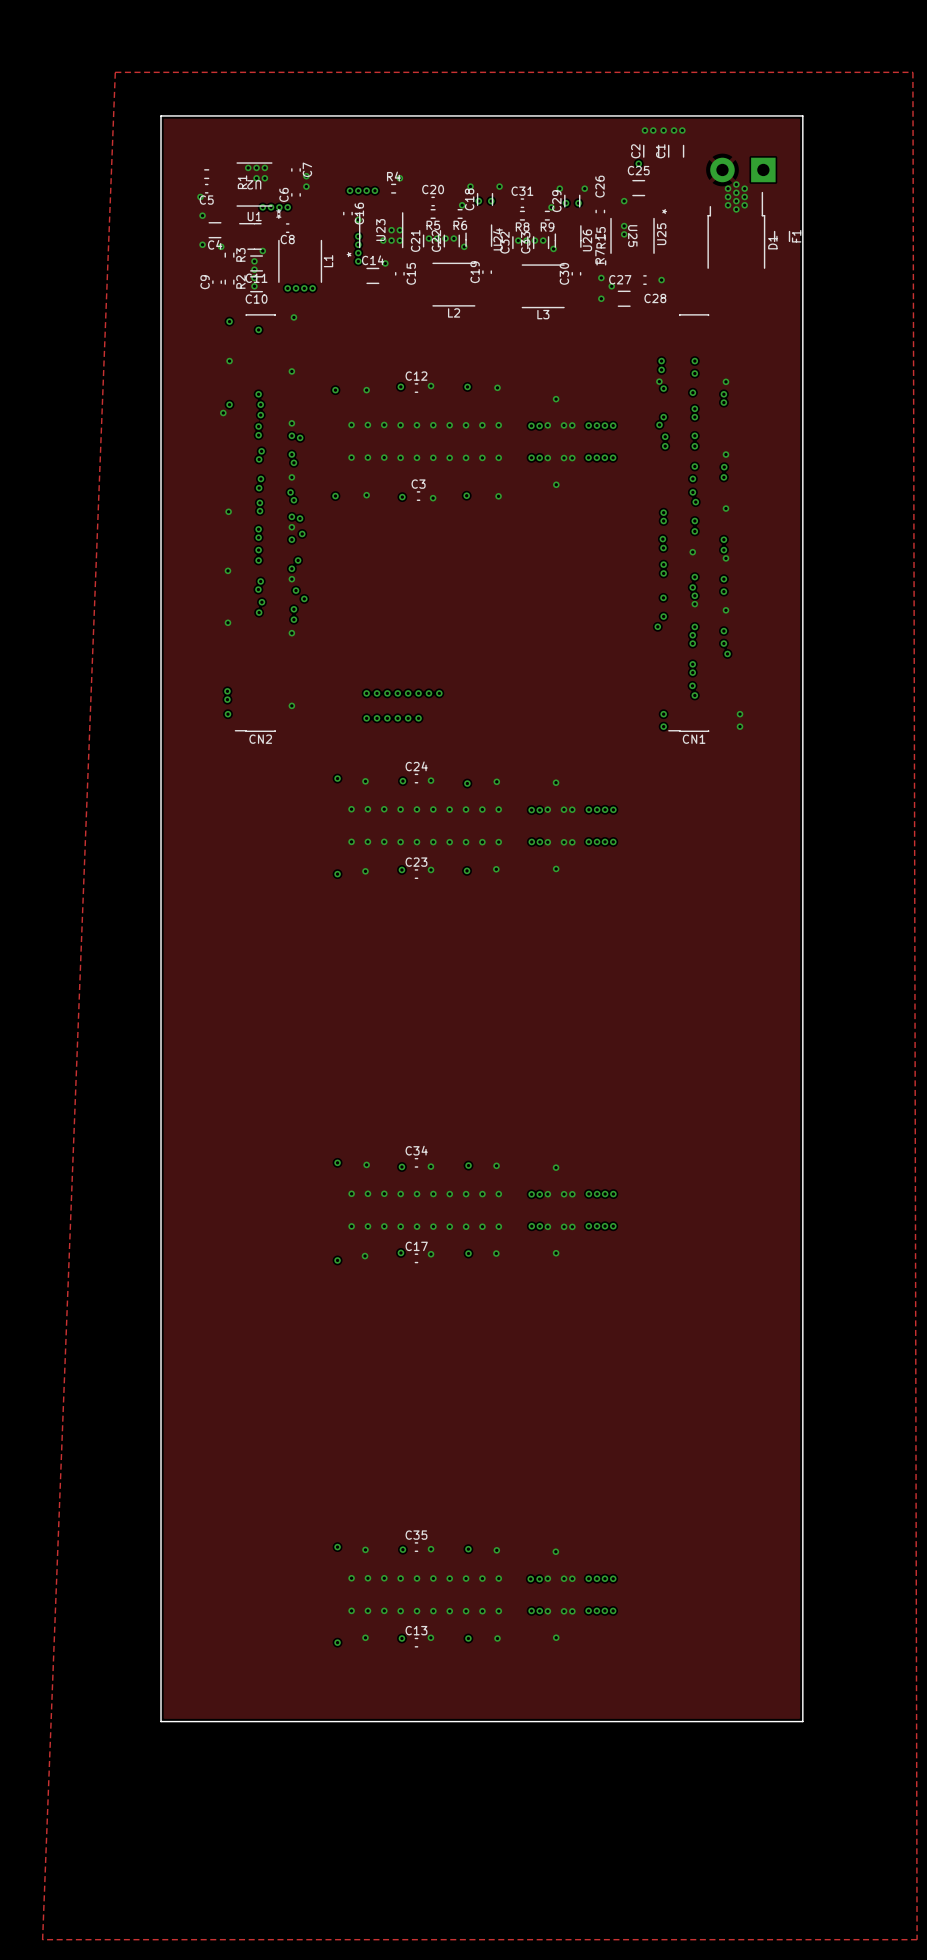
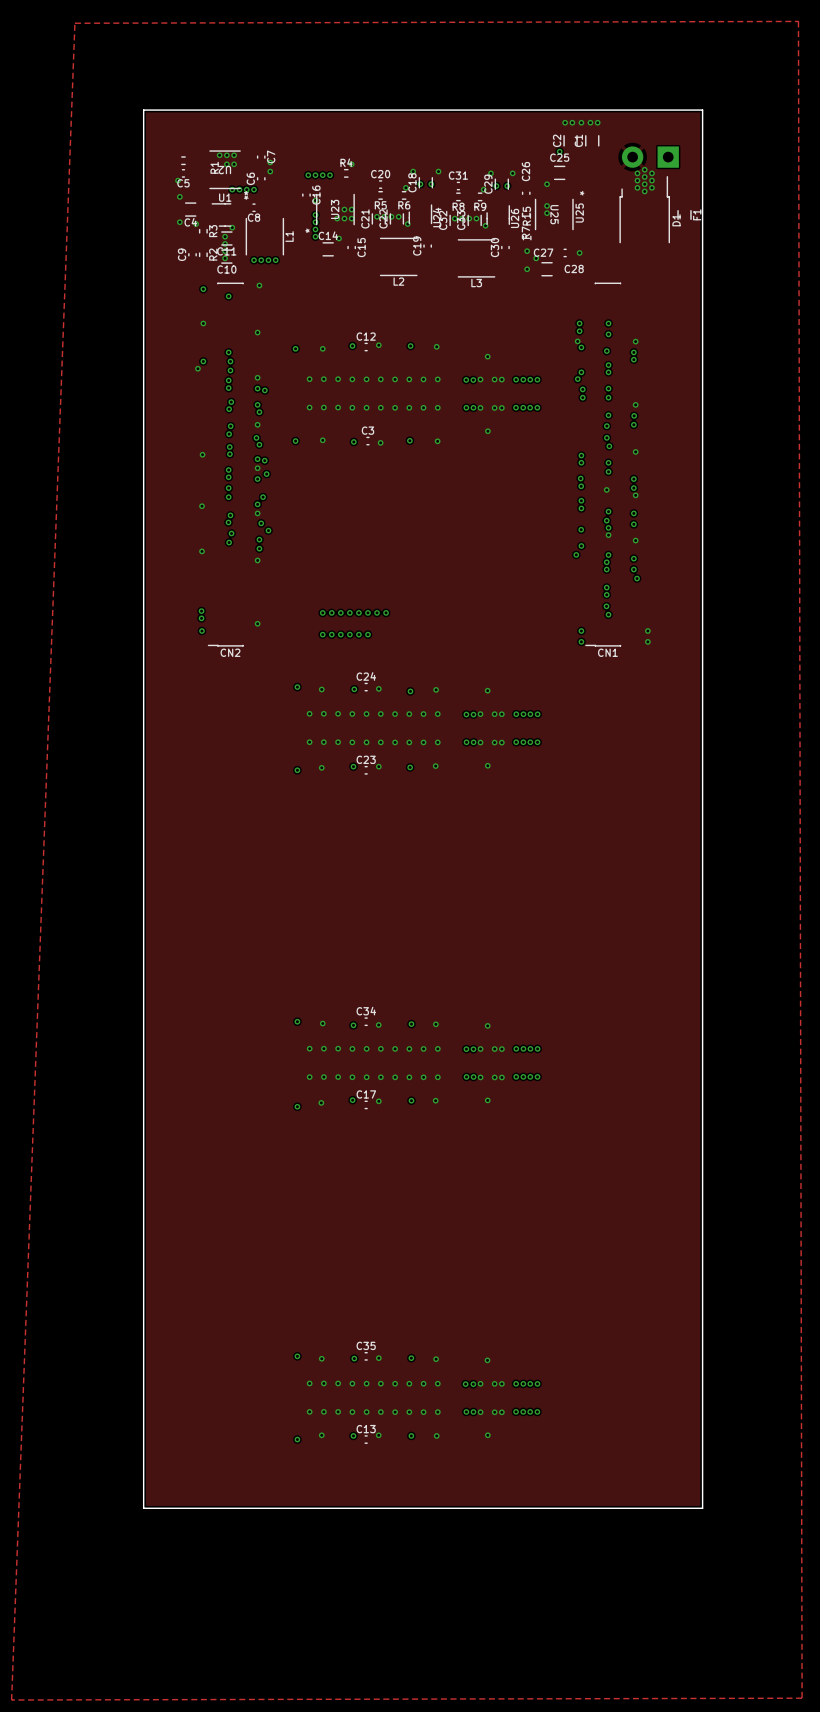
zone outline: (115, 72) (912, 72) (917, 1939) (42, 1939) (115, 72) -> (798, 21) (74, 23) (11, 1700) (802, 1698) (798, 21)

